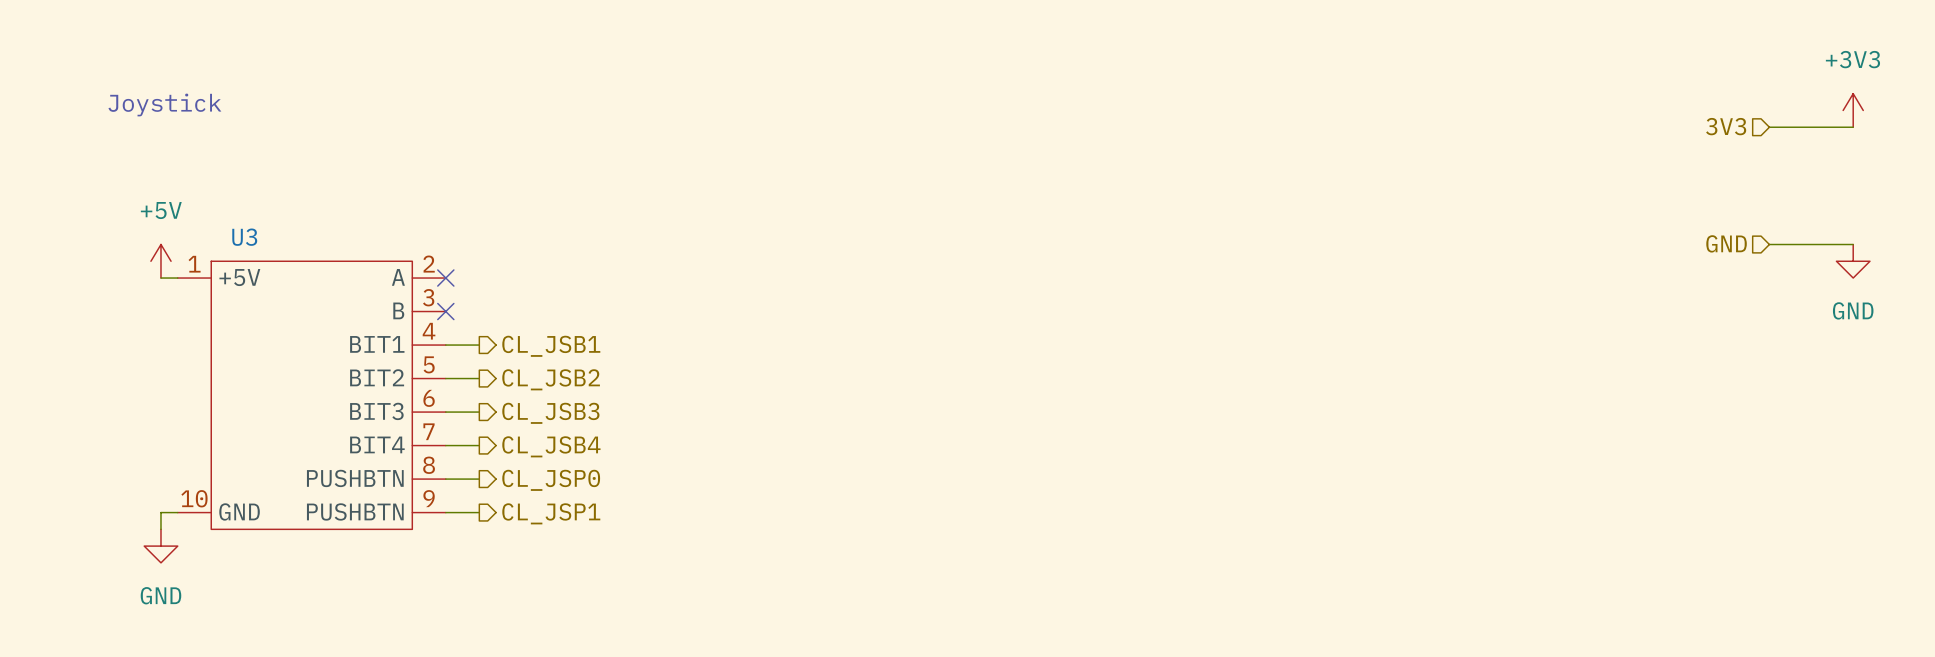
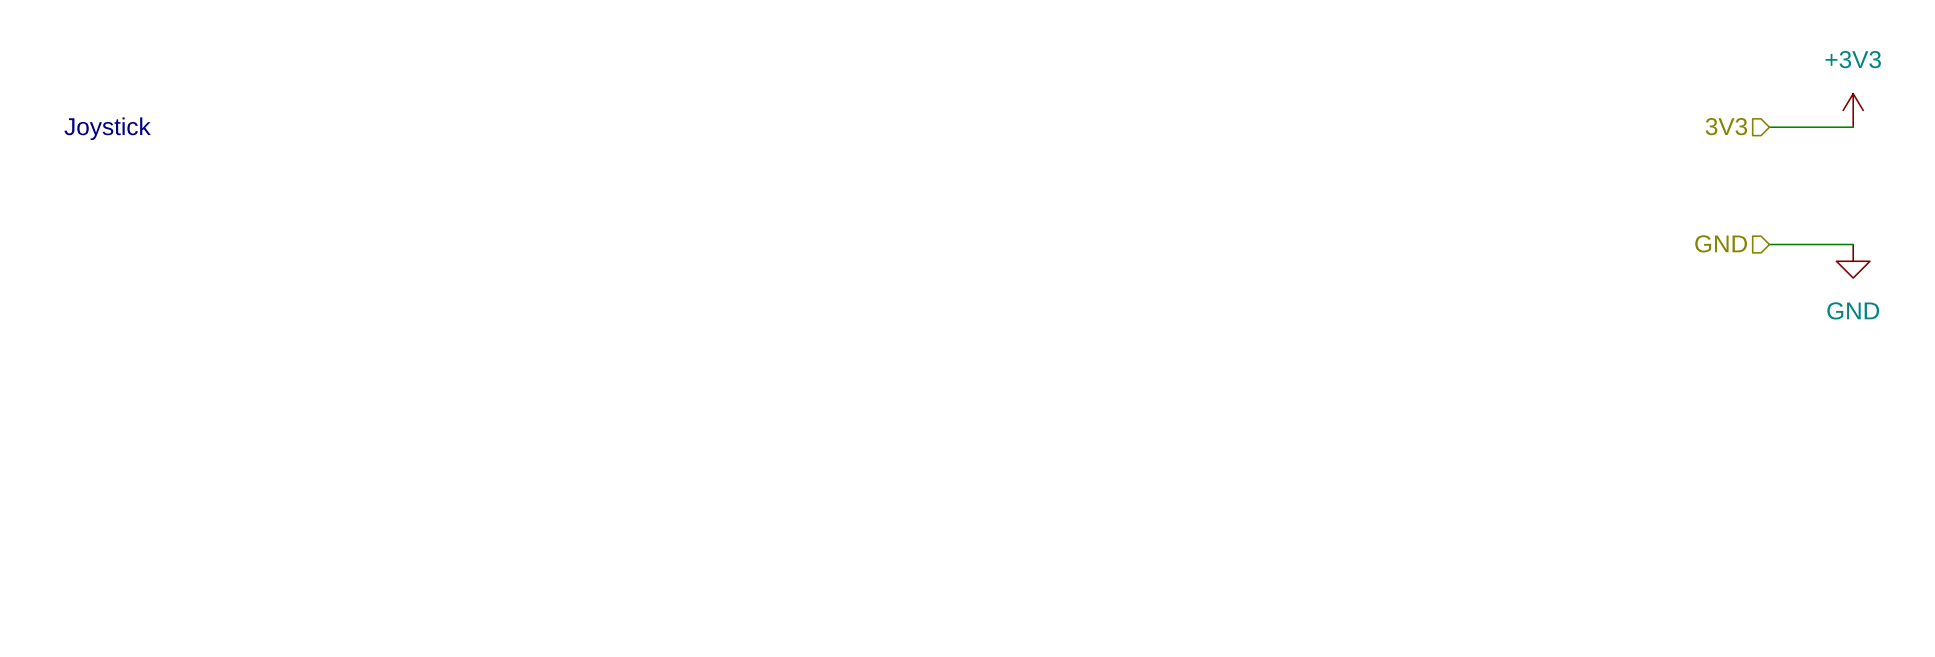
text position: Joystick (164, 105) -> Joystick (107, 128)
power symbol: +5V (160, 261) -> none
wire: (160, 278) (177, 278) -> none
no-connect mark: (445, 278) -> none
no-connect mark: (445, 311) -> none
wire: (445, 345) (479, 345) -> none
hierarchical label: CL_JSB1 (551, 346) -> none
wire: (445, 378) (479, 378) -> none
hierarchical label: CL_JSB2 (551, 379) -> none
U3: (311, 395) -> none
wire: (445, 412) (479, 412) -> none
hierarchical label: CL_JSB3 (550, 413) -> none
wire: (445, 445) (479, 445) -> none
hierarchical label: CL_JSB4 (551, 446) -> none
wire: (445, 479) (479, 479) -> none
hierarchical label: CL_JSP0 (551, 480) -> none
wire: (177, 512) (160, 512) (160, 529) -> none
wire: (445, 512) (479, 512) -> none
hierarchical label: CL_JSP1 (551, 513) -> none
power symbol: GND (160, 546) -> none

